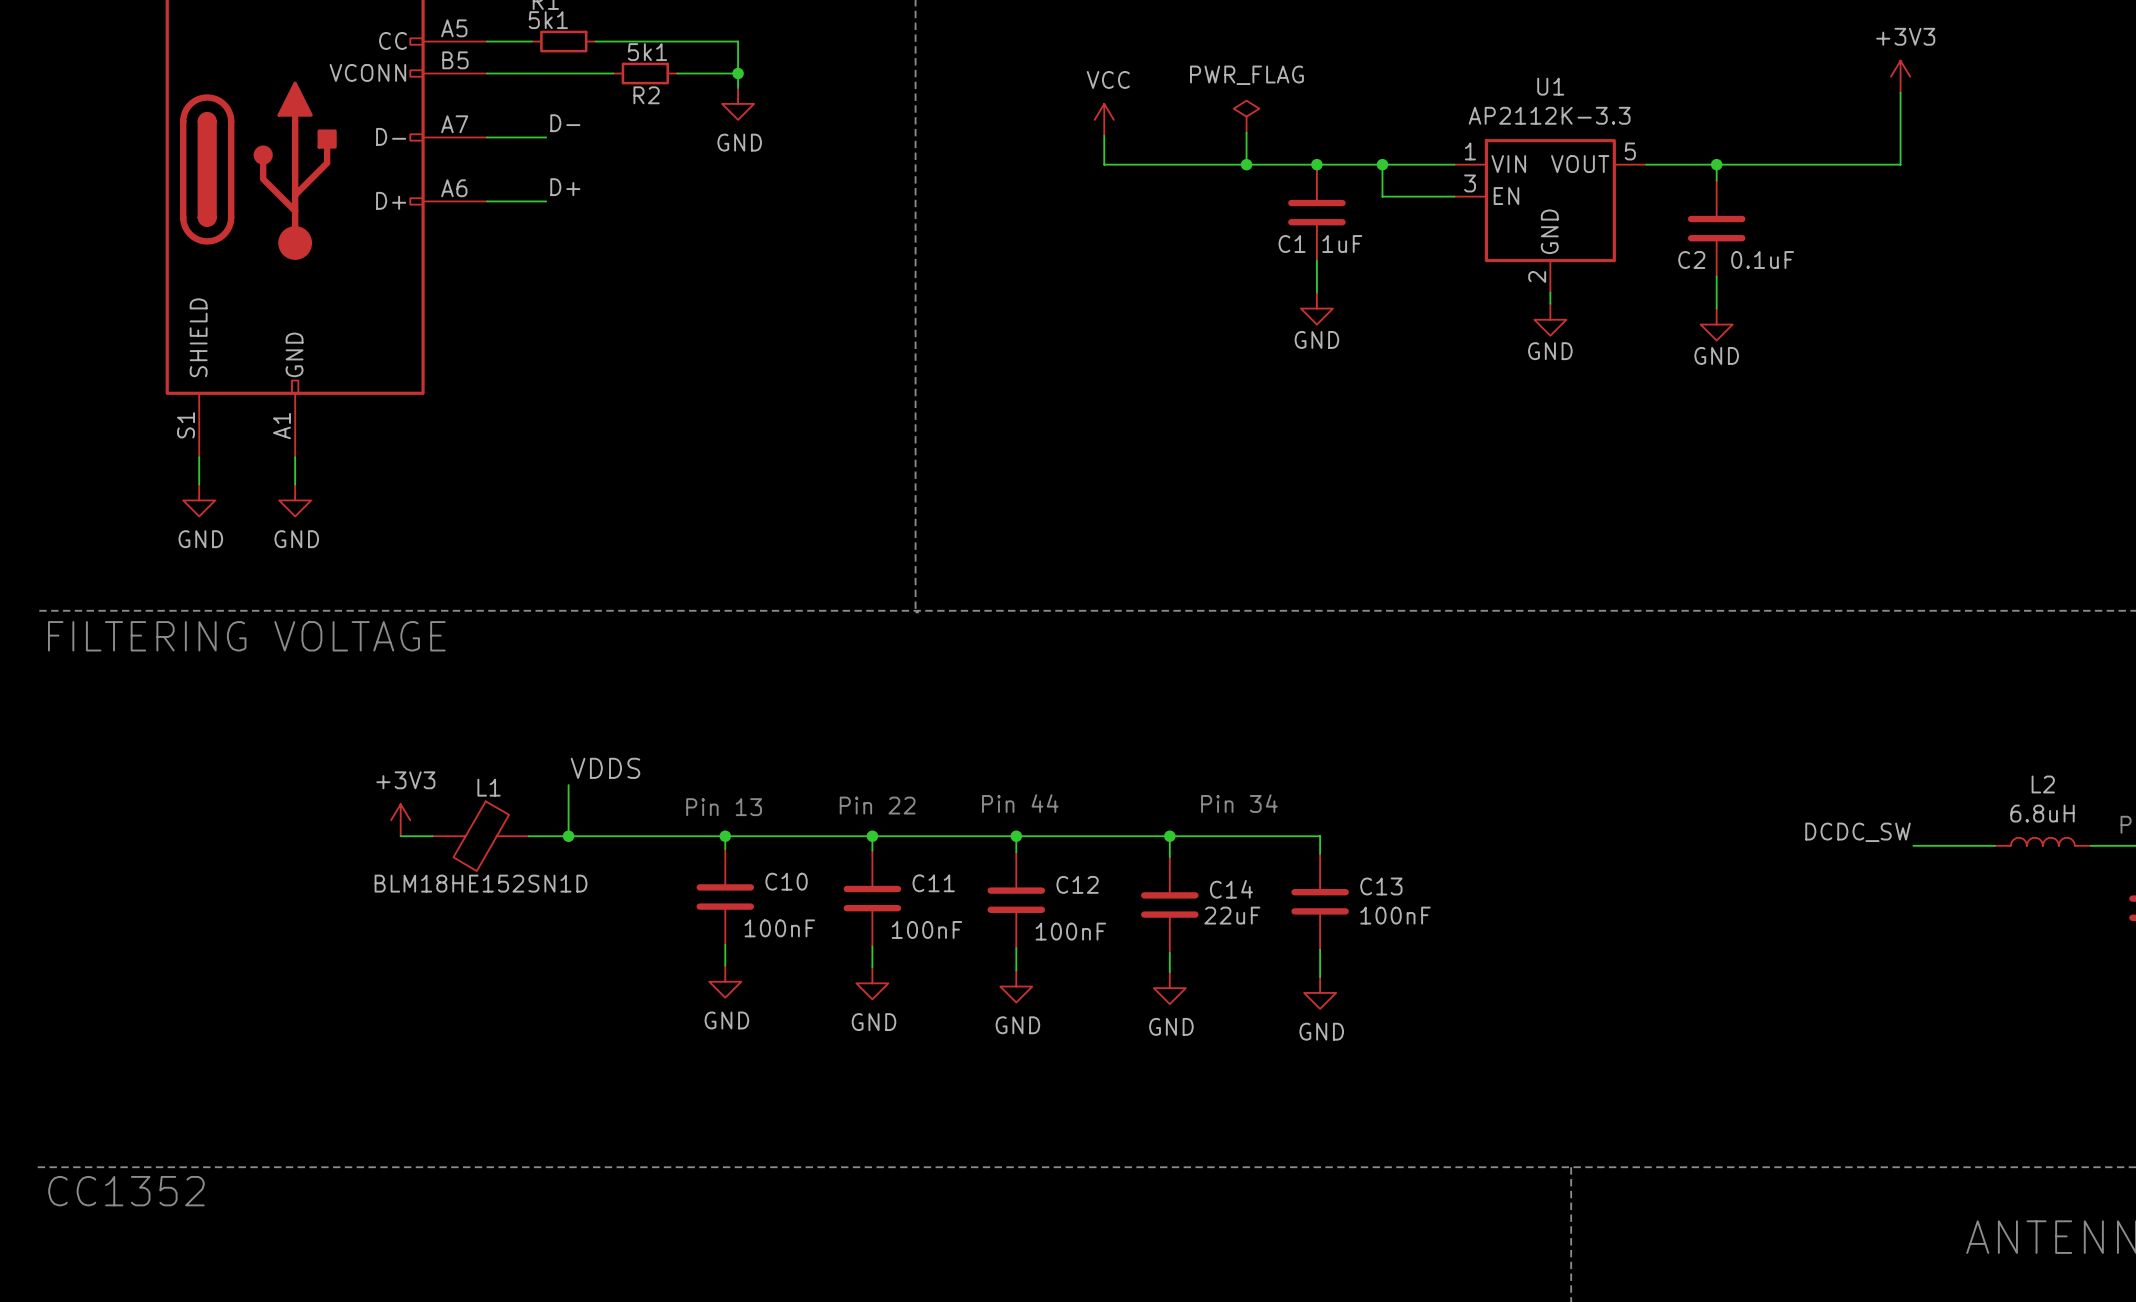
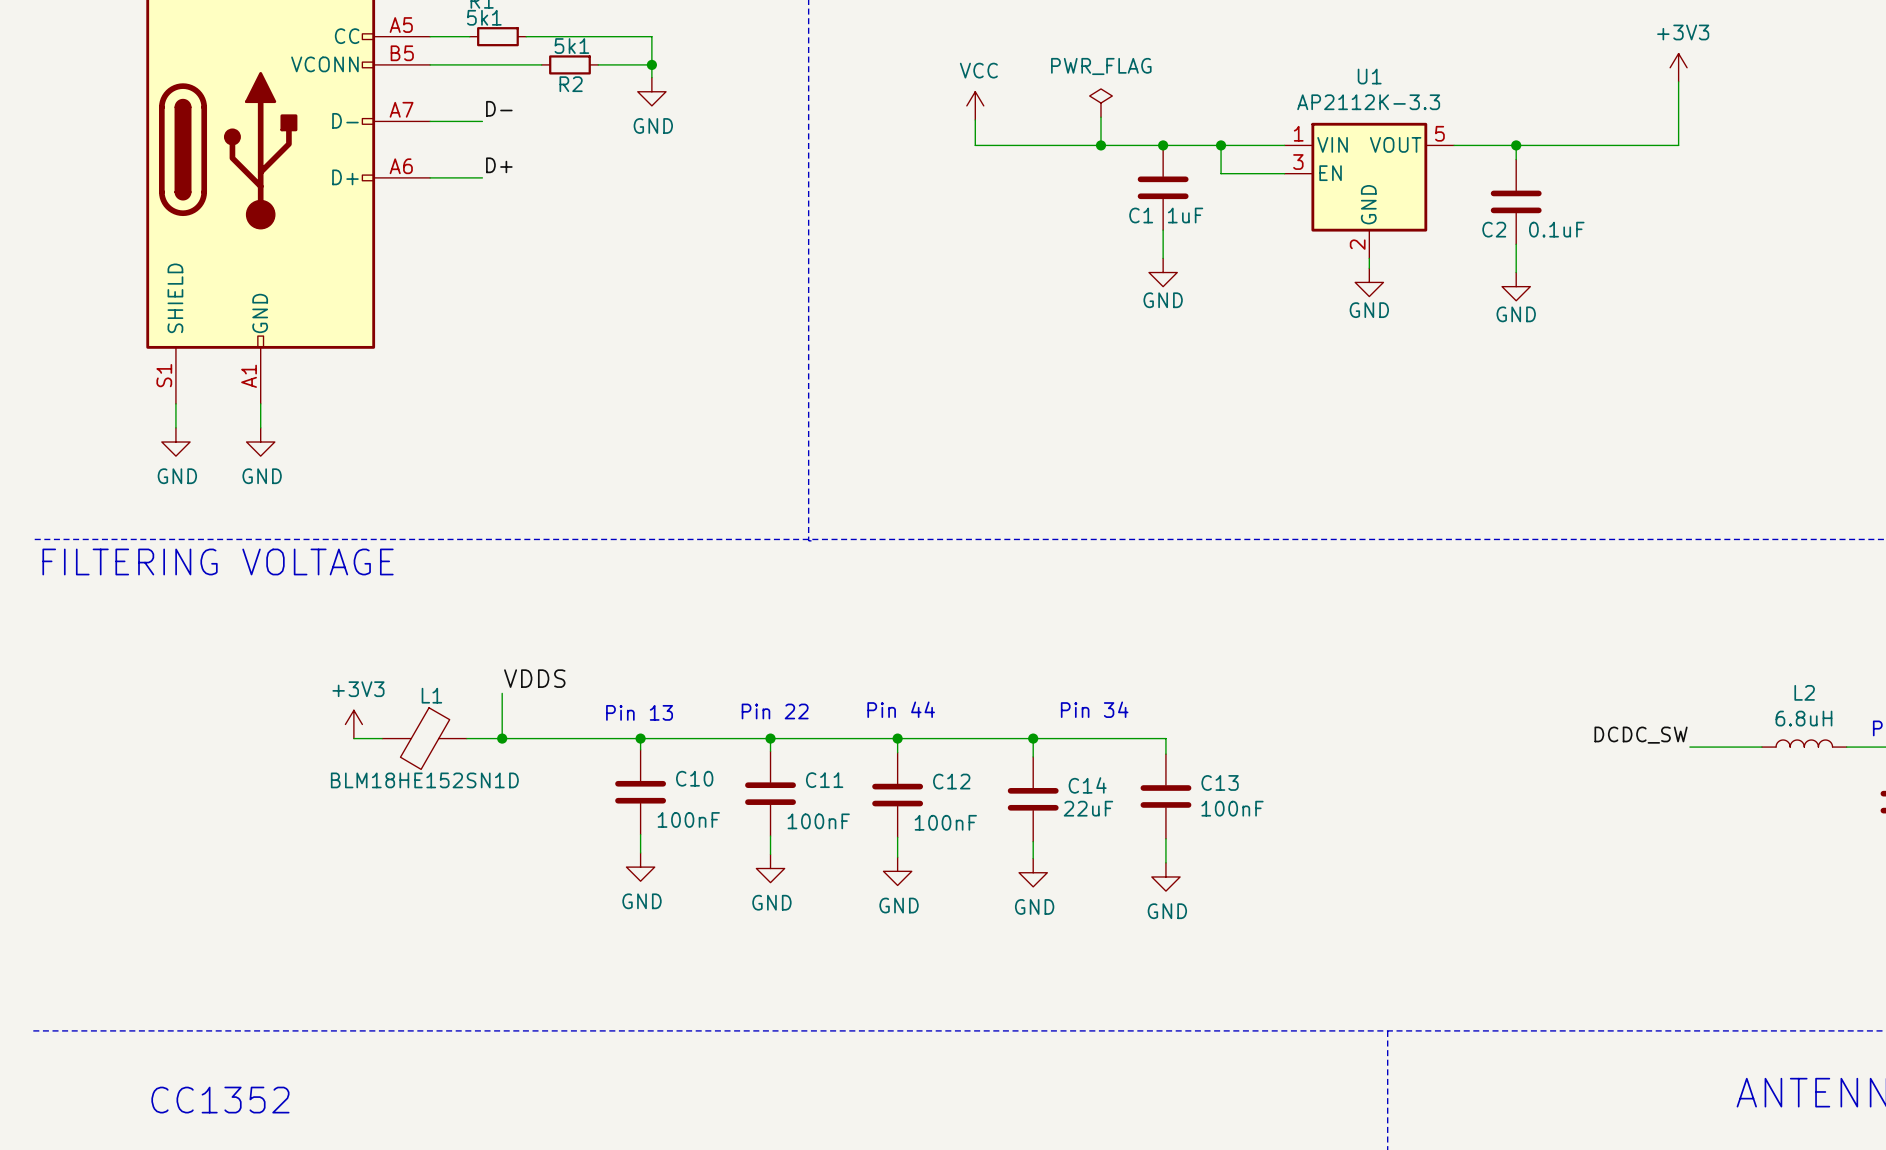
text position: CC1352 (126, 1191) -> CC1352 (220, 1100)

